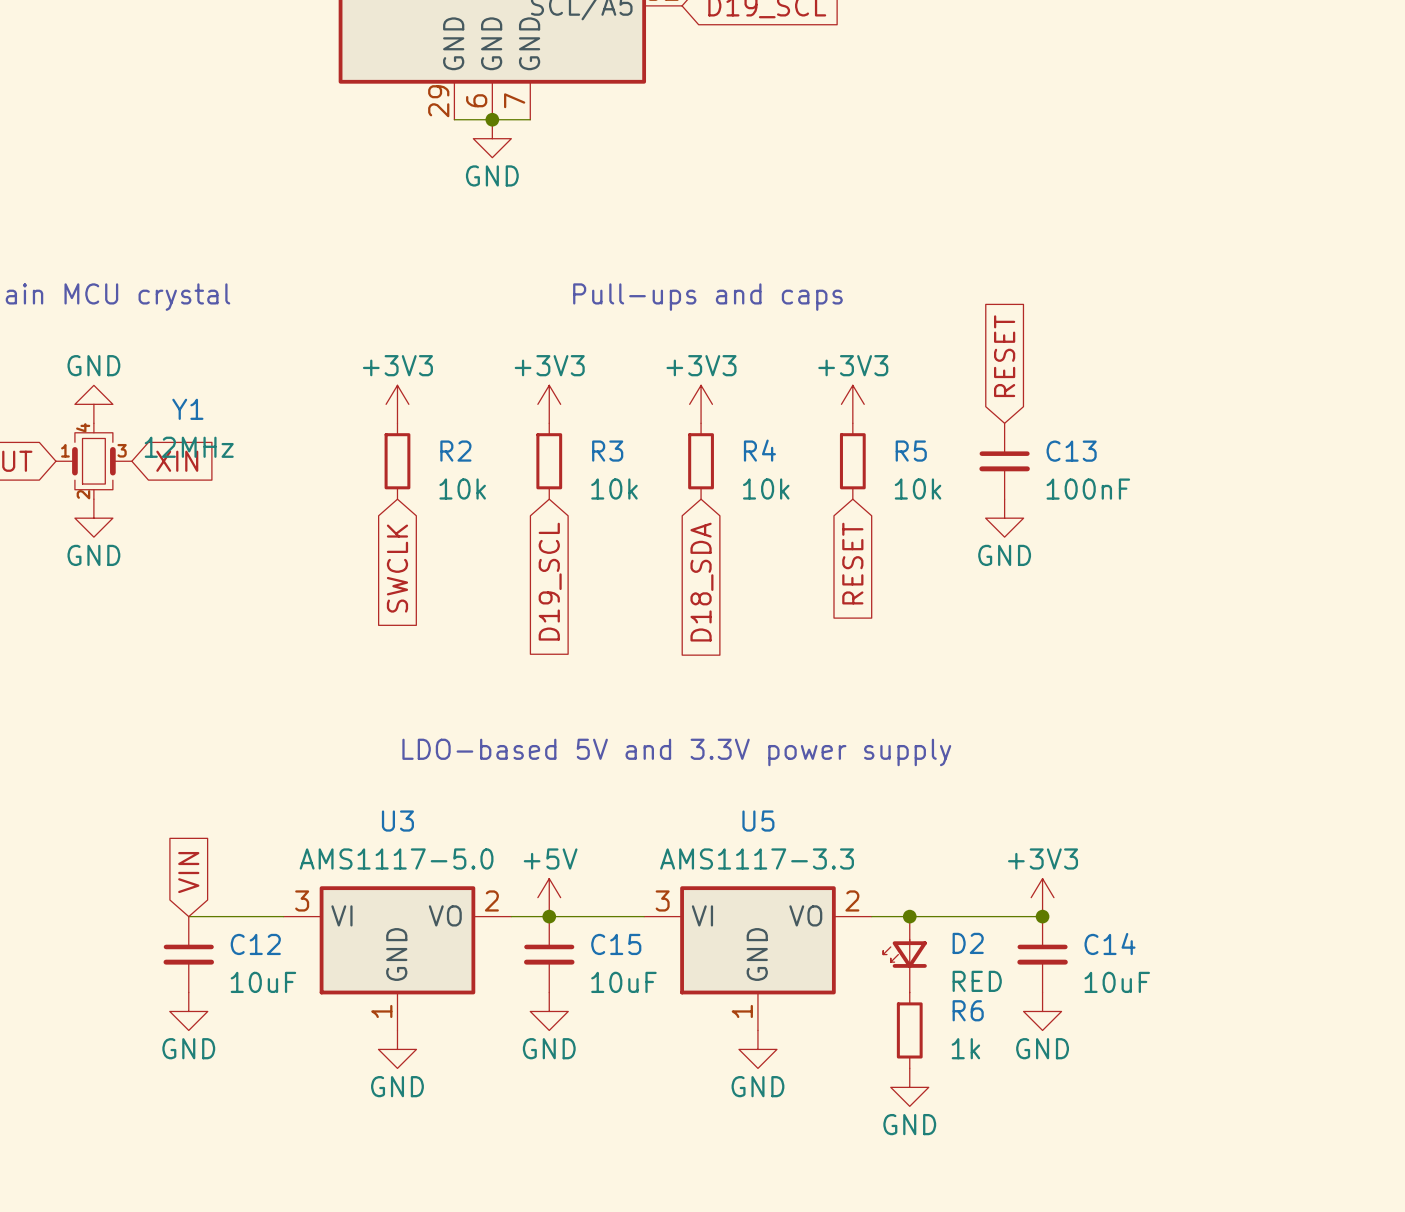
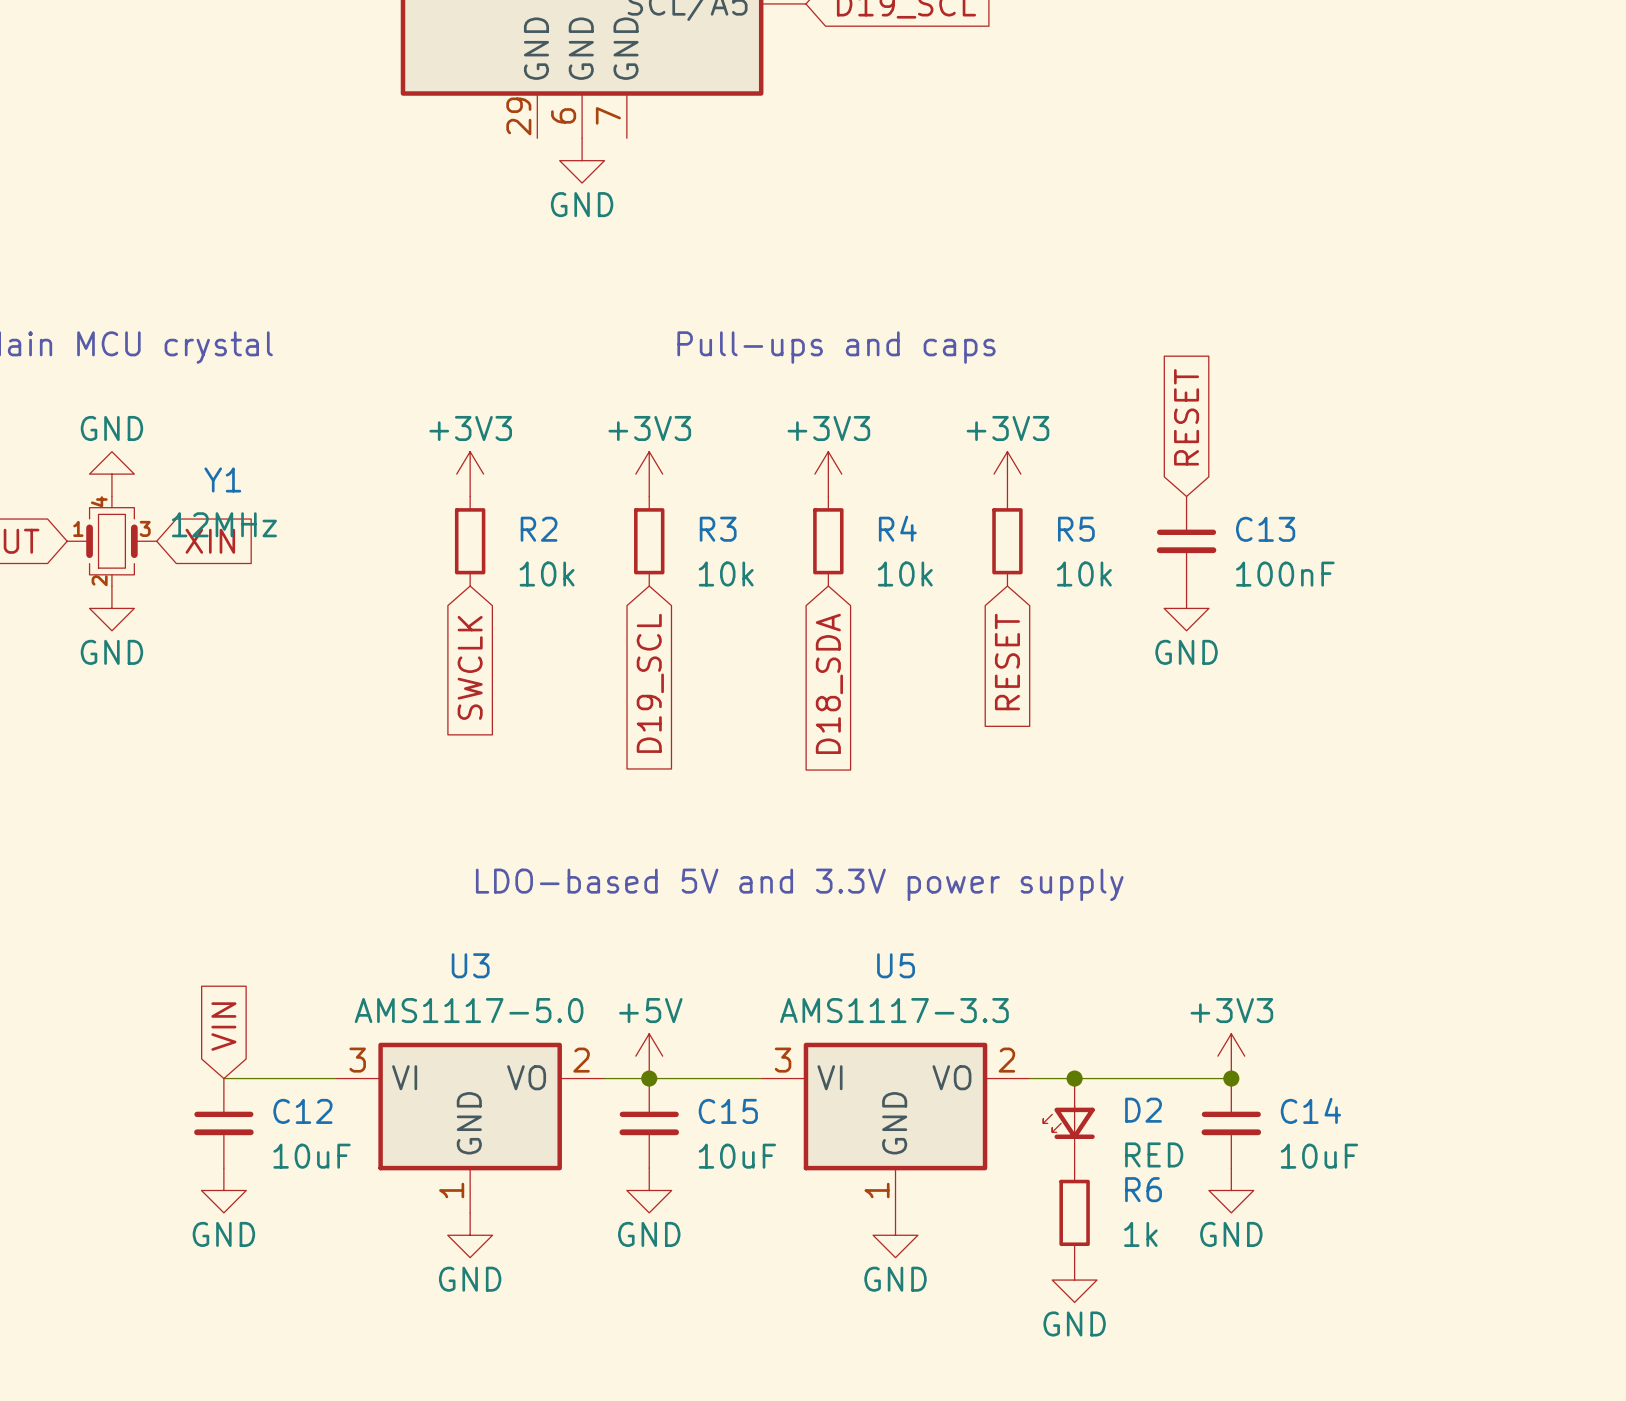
wire: (454, 119) (530, 119) -> none
junction: (492, 119) -> none

